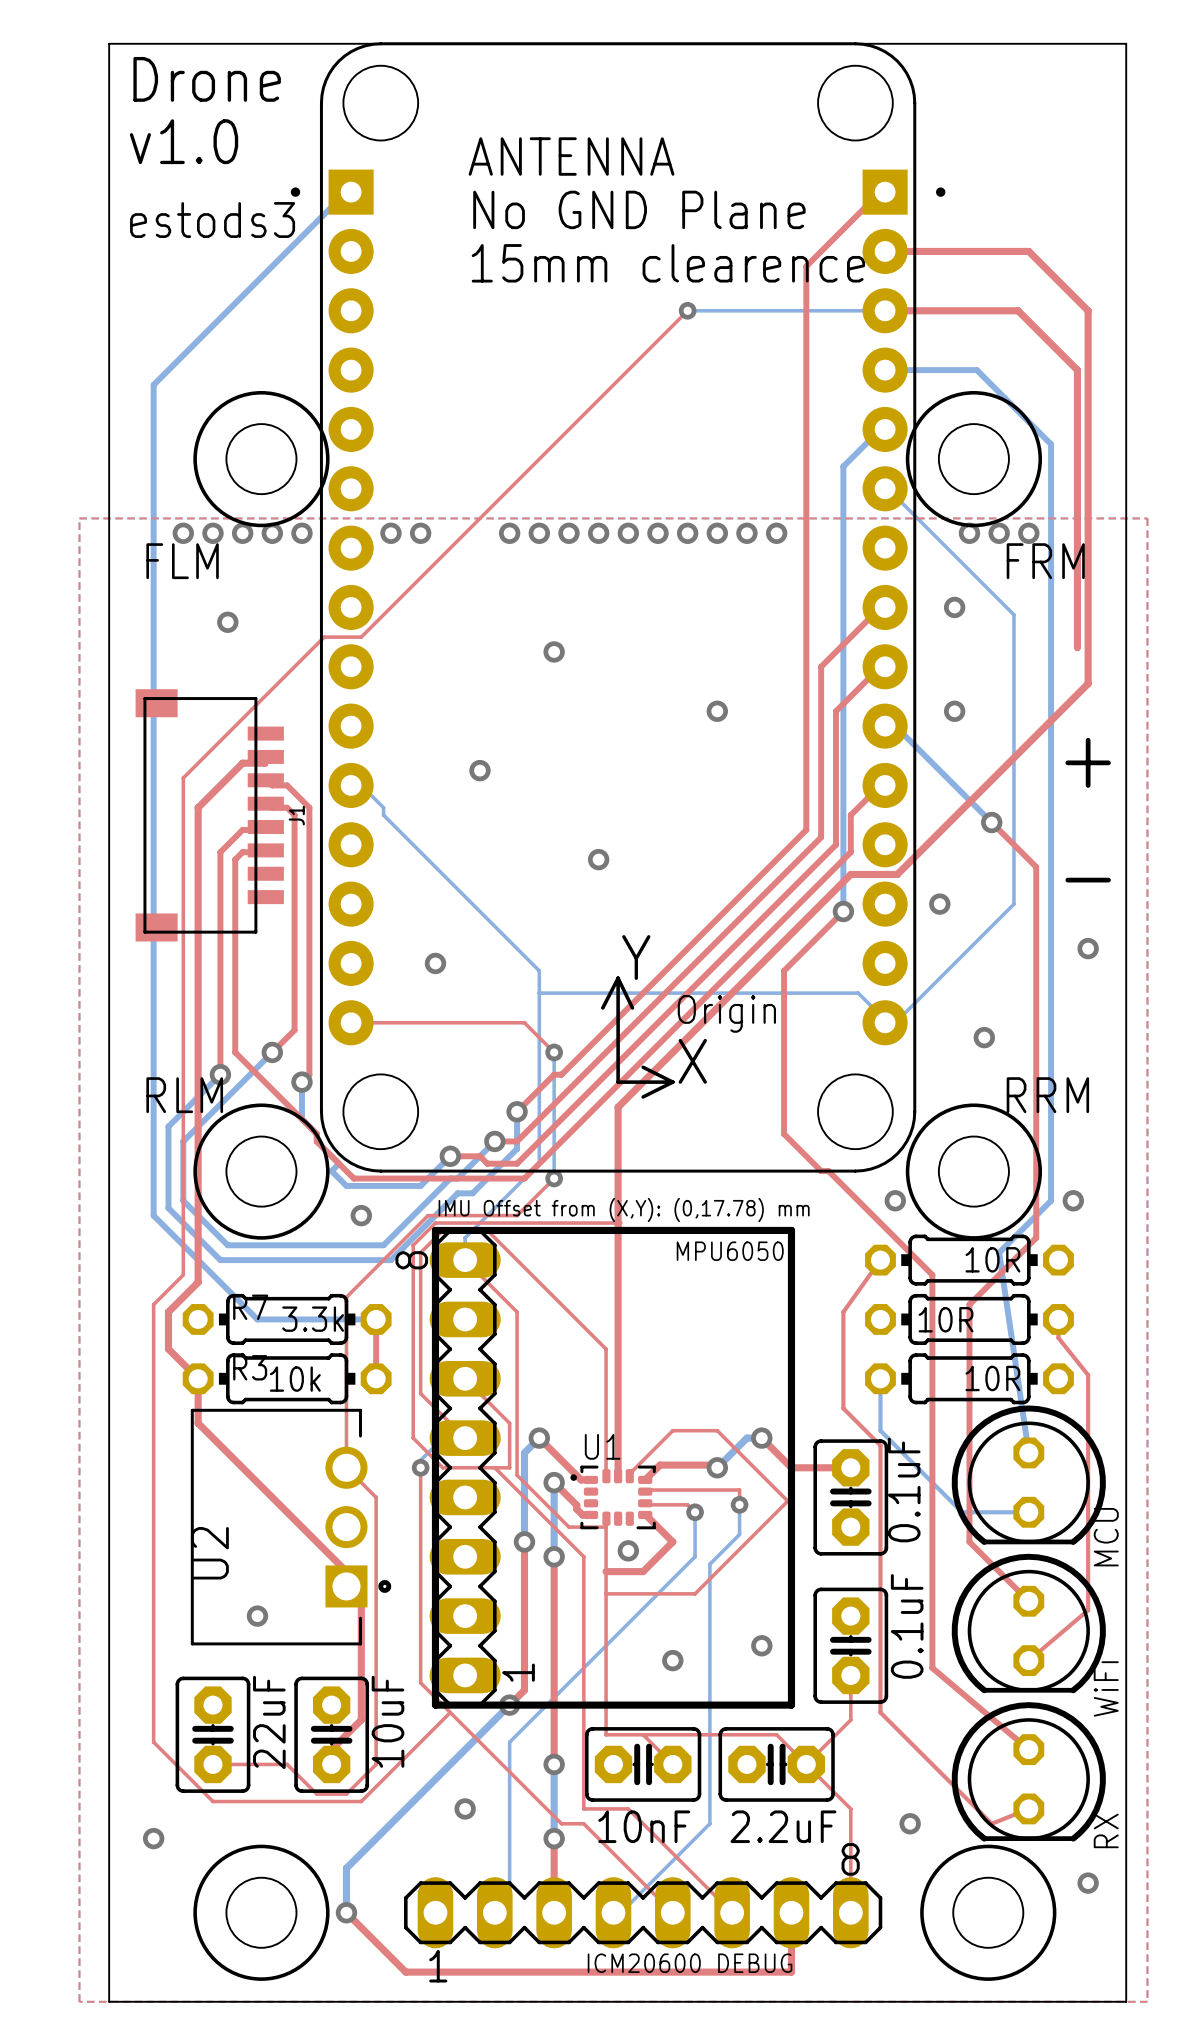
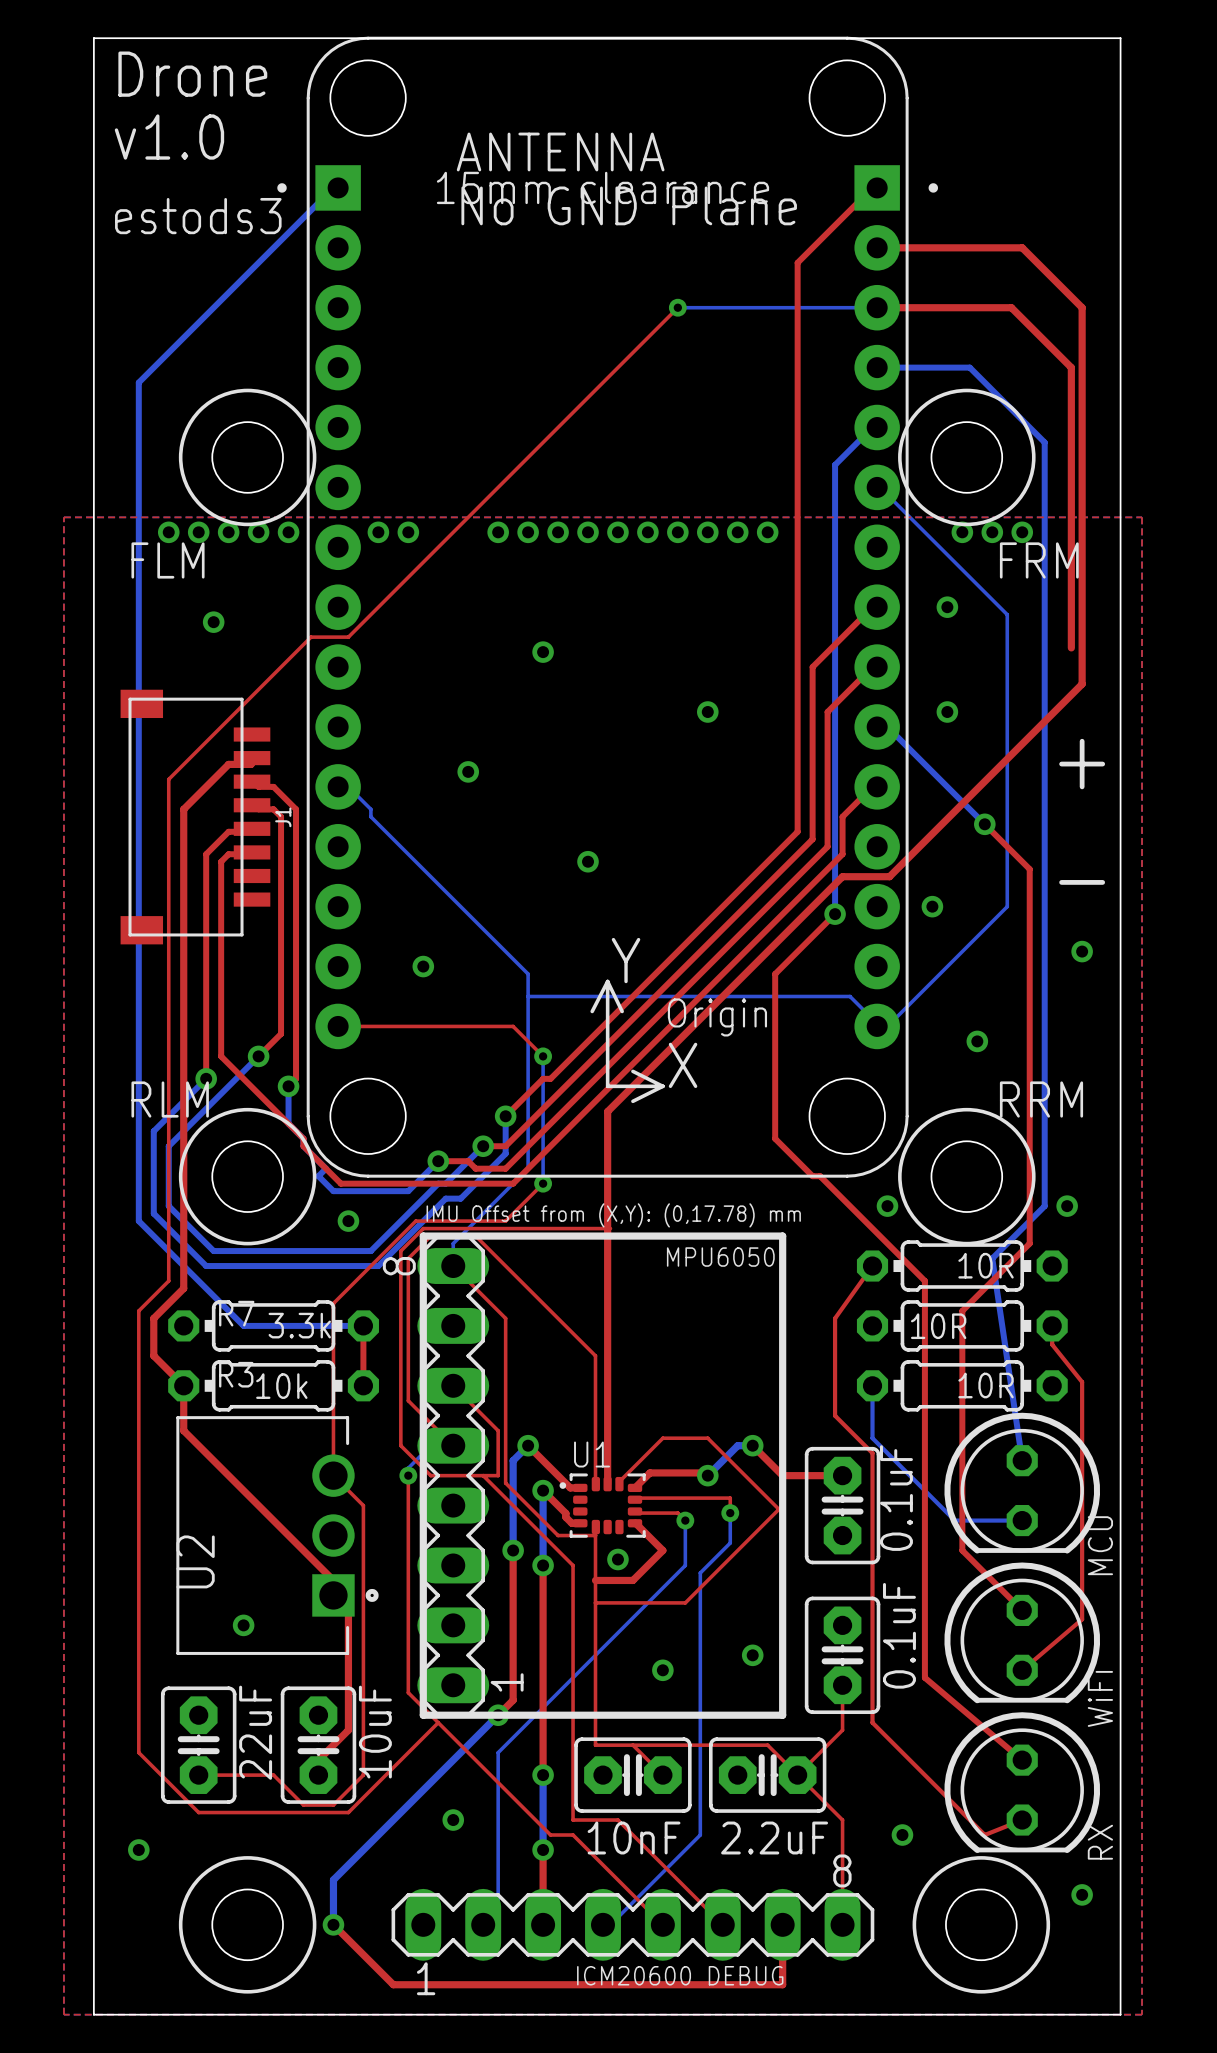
text: none -> 15mm clearance (602, 187)
text: 15mm clearence (668, 263) -> none

